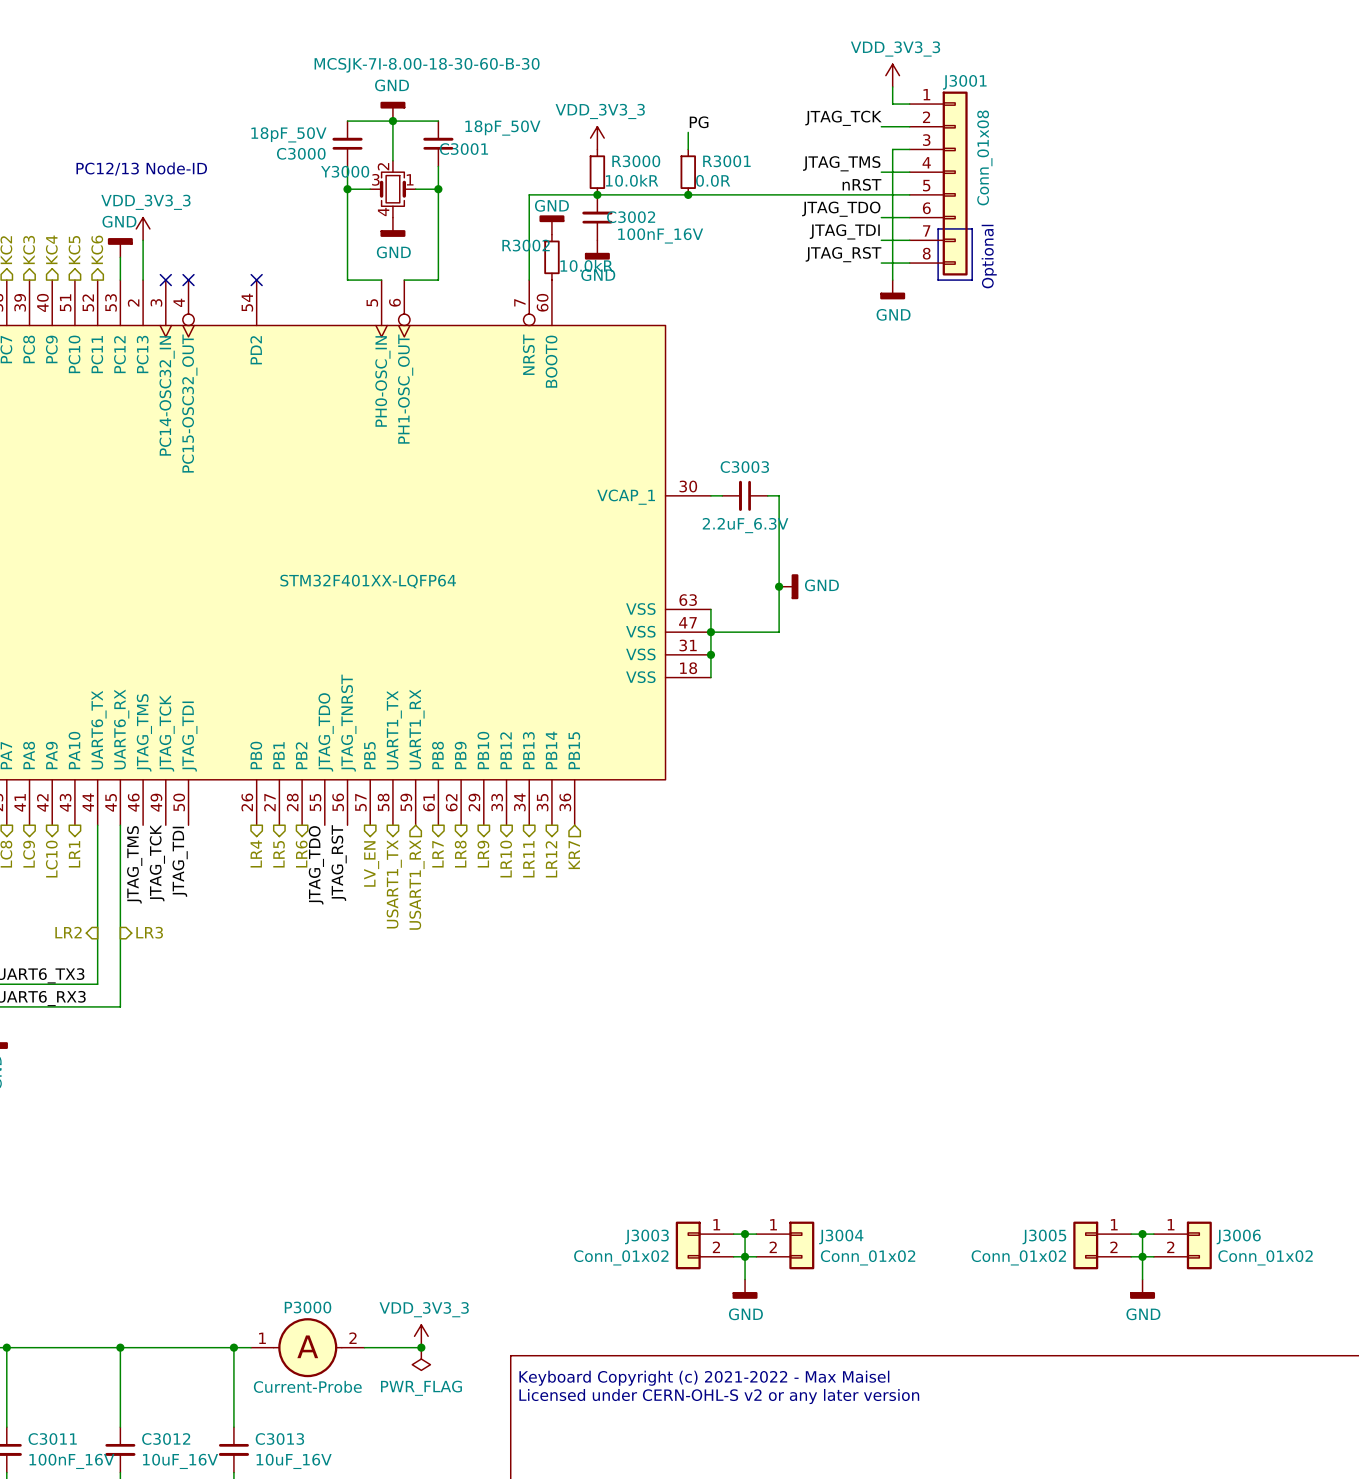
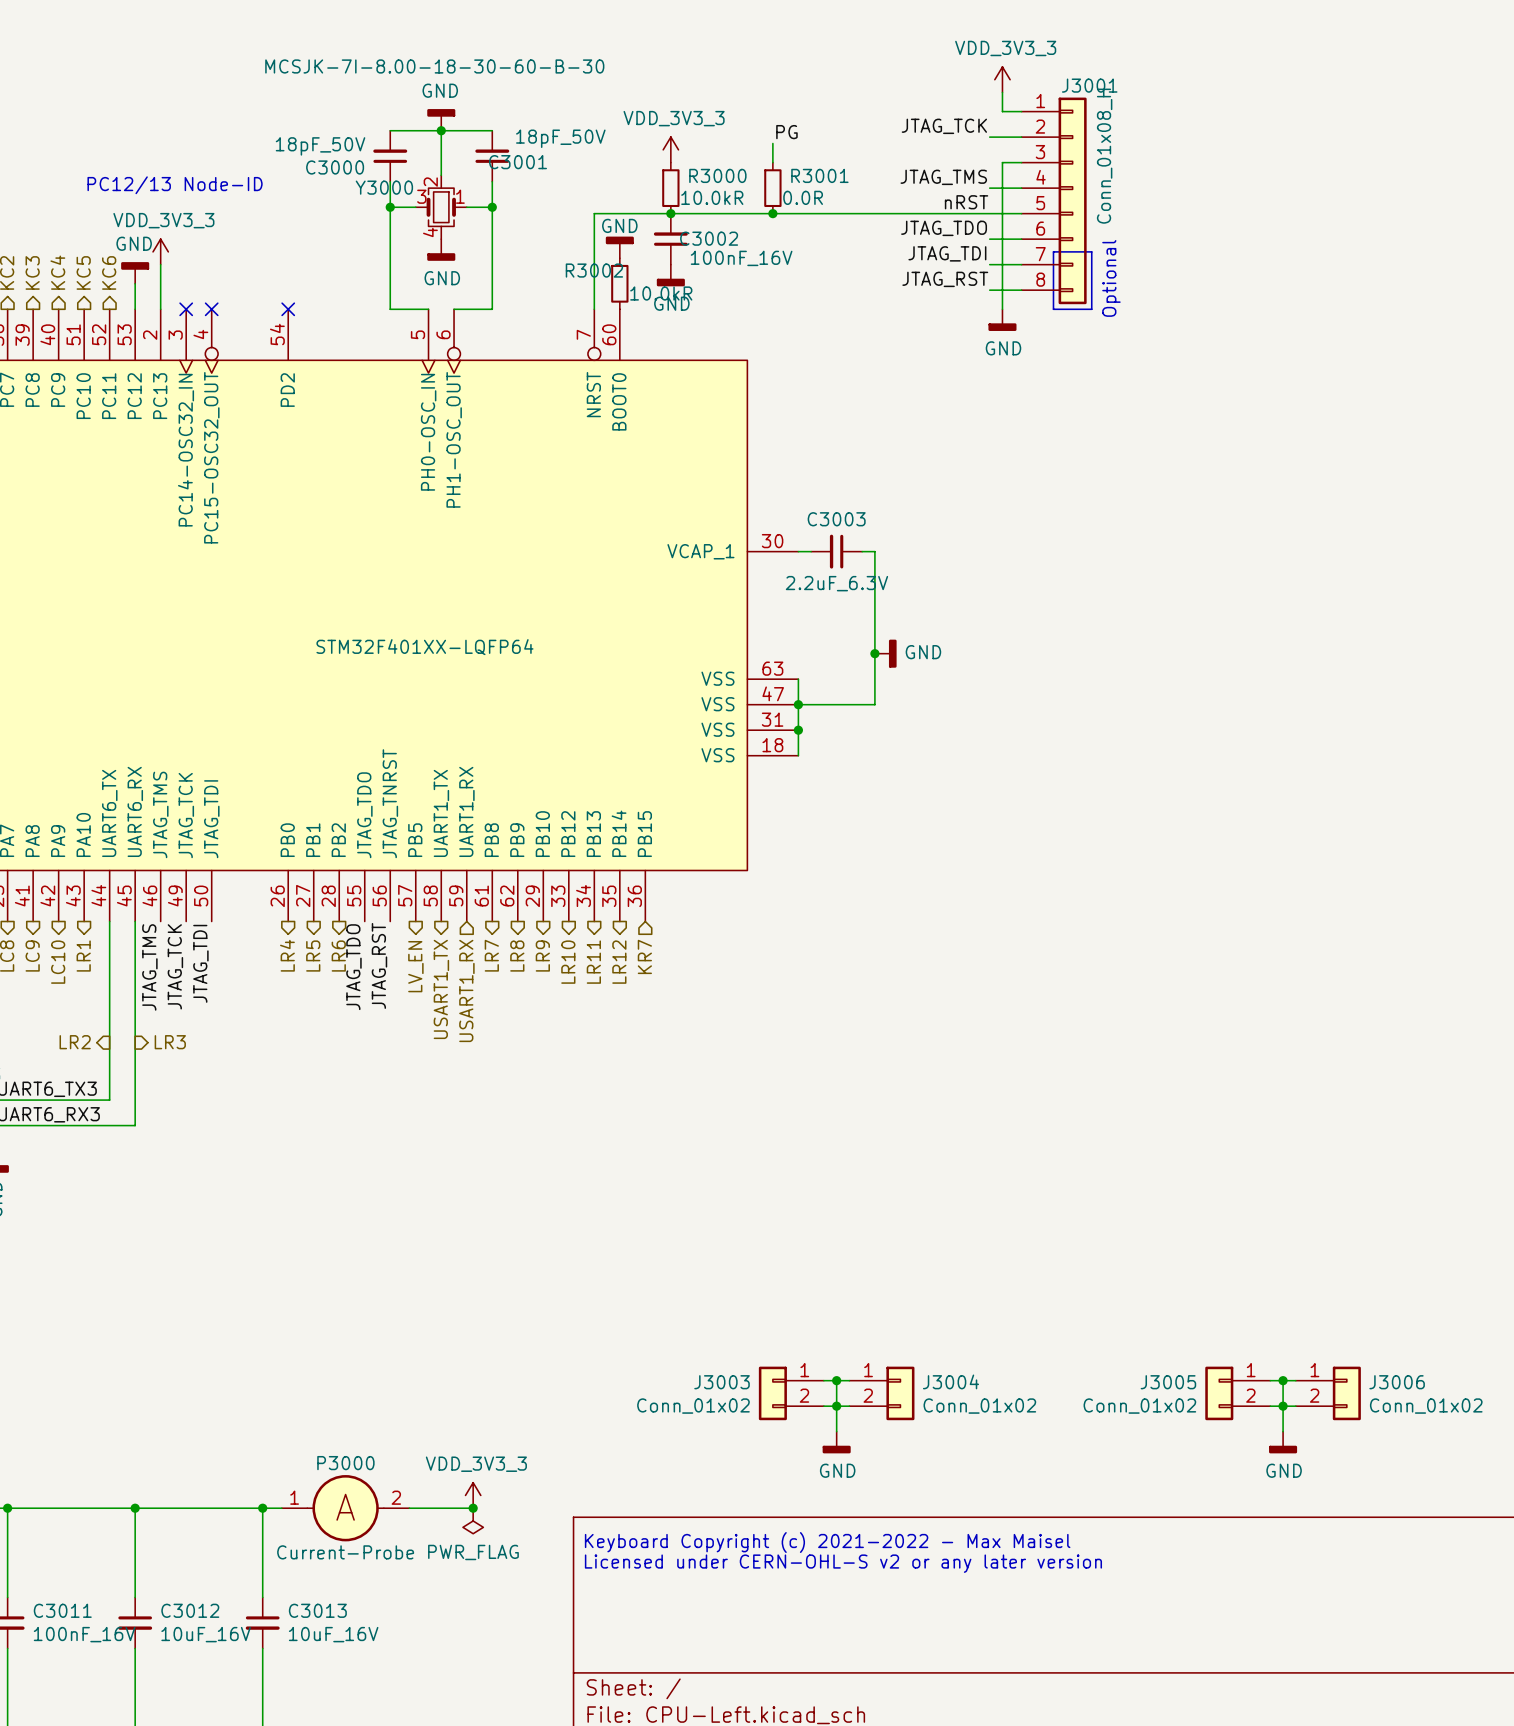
J3001 value: Conn_01x08 (984, 157) -> Conn_01x08_H (1104, 156)

